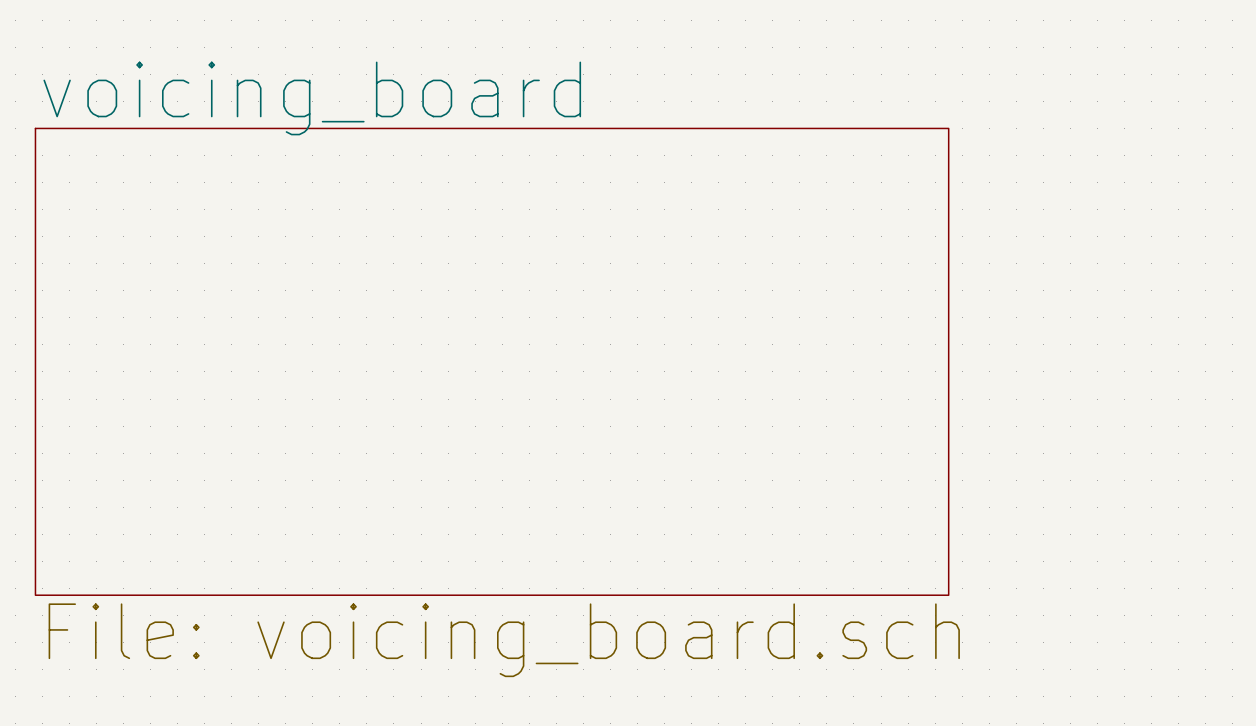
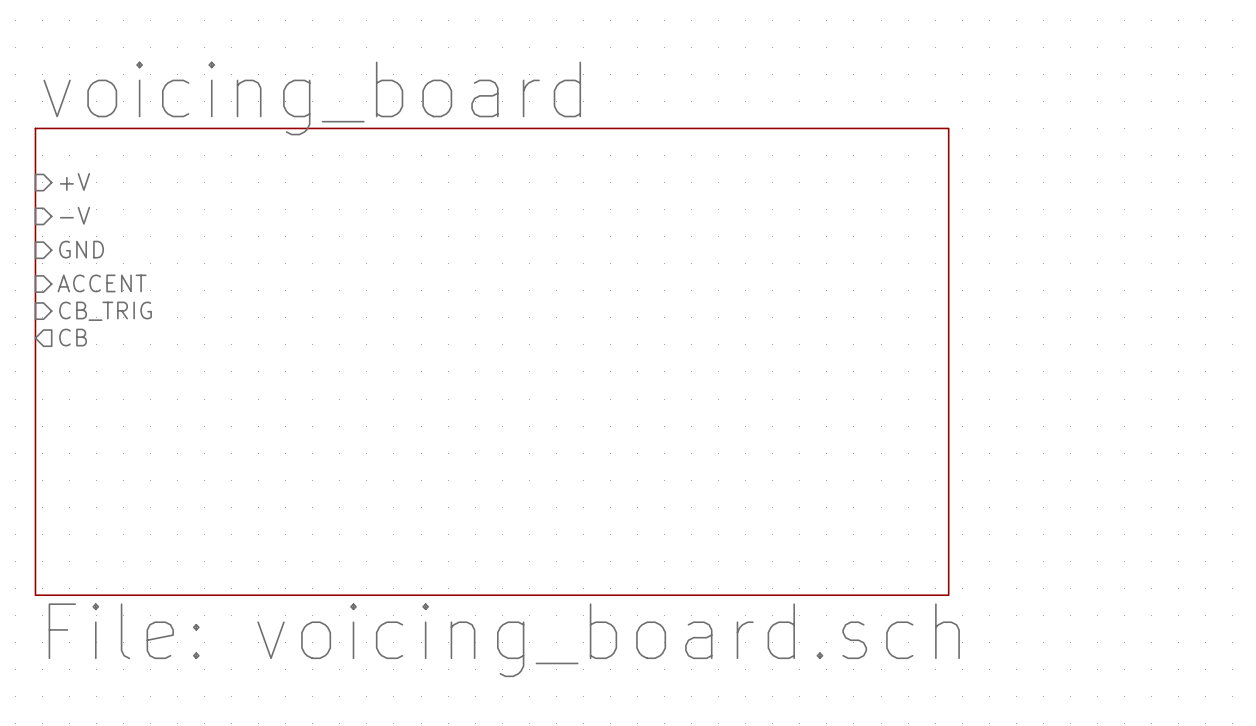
sheet pin: none -> +V (74, 181)
sheet pin: none -> -V (74, 215)
sheet pin: none -> GND (81, 249)
sheet pin: none -> ACCENT (102, 283)
sheet pin: none -> CB_TRIG (105, 311)
sheet pin: none -> CB (73, 337)

